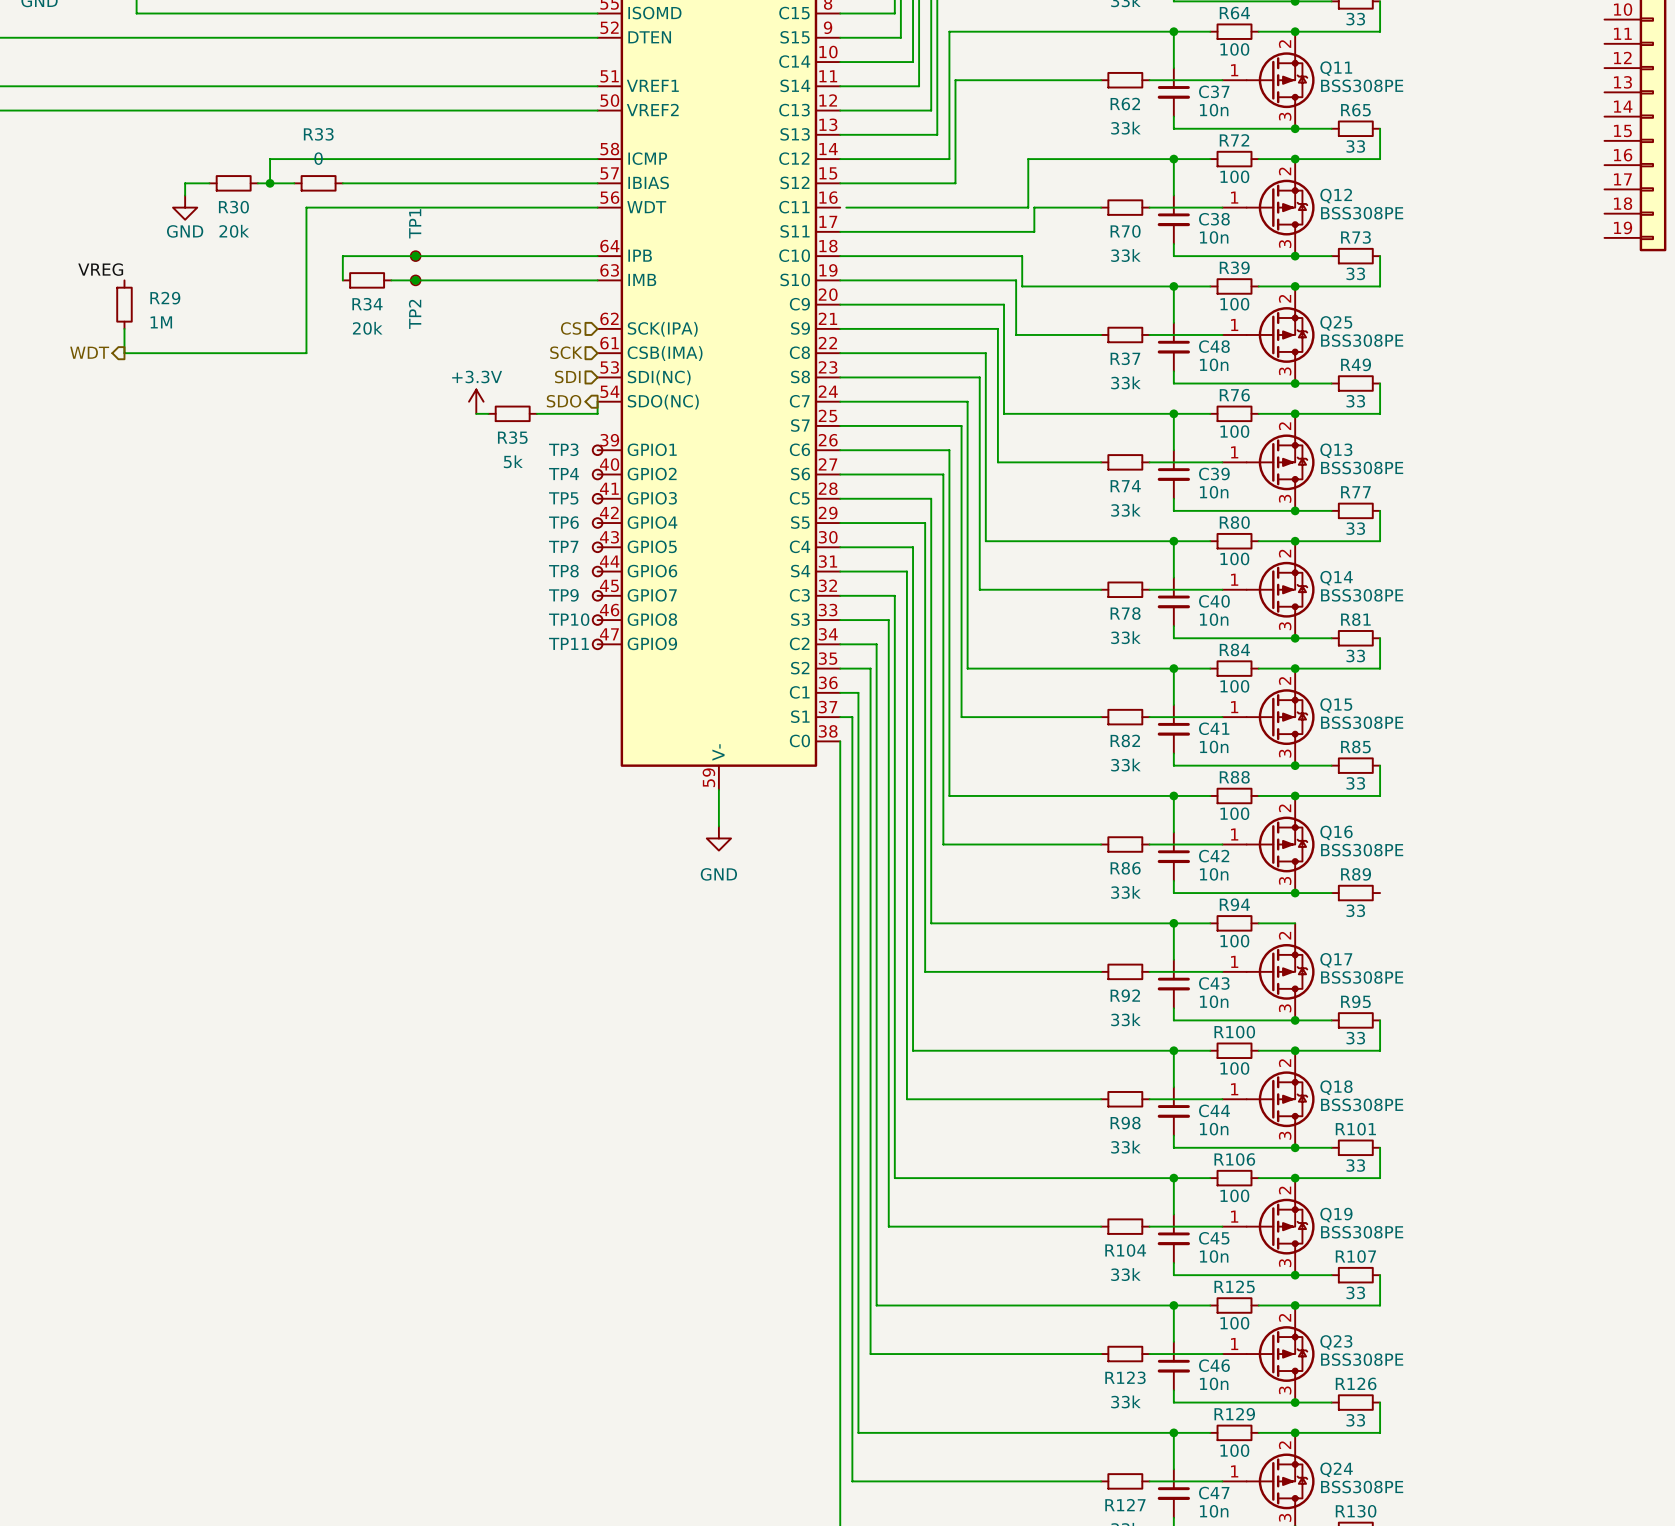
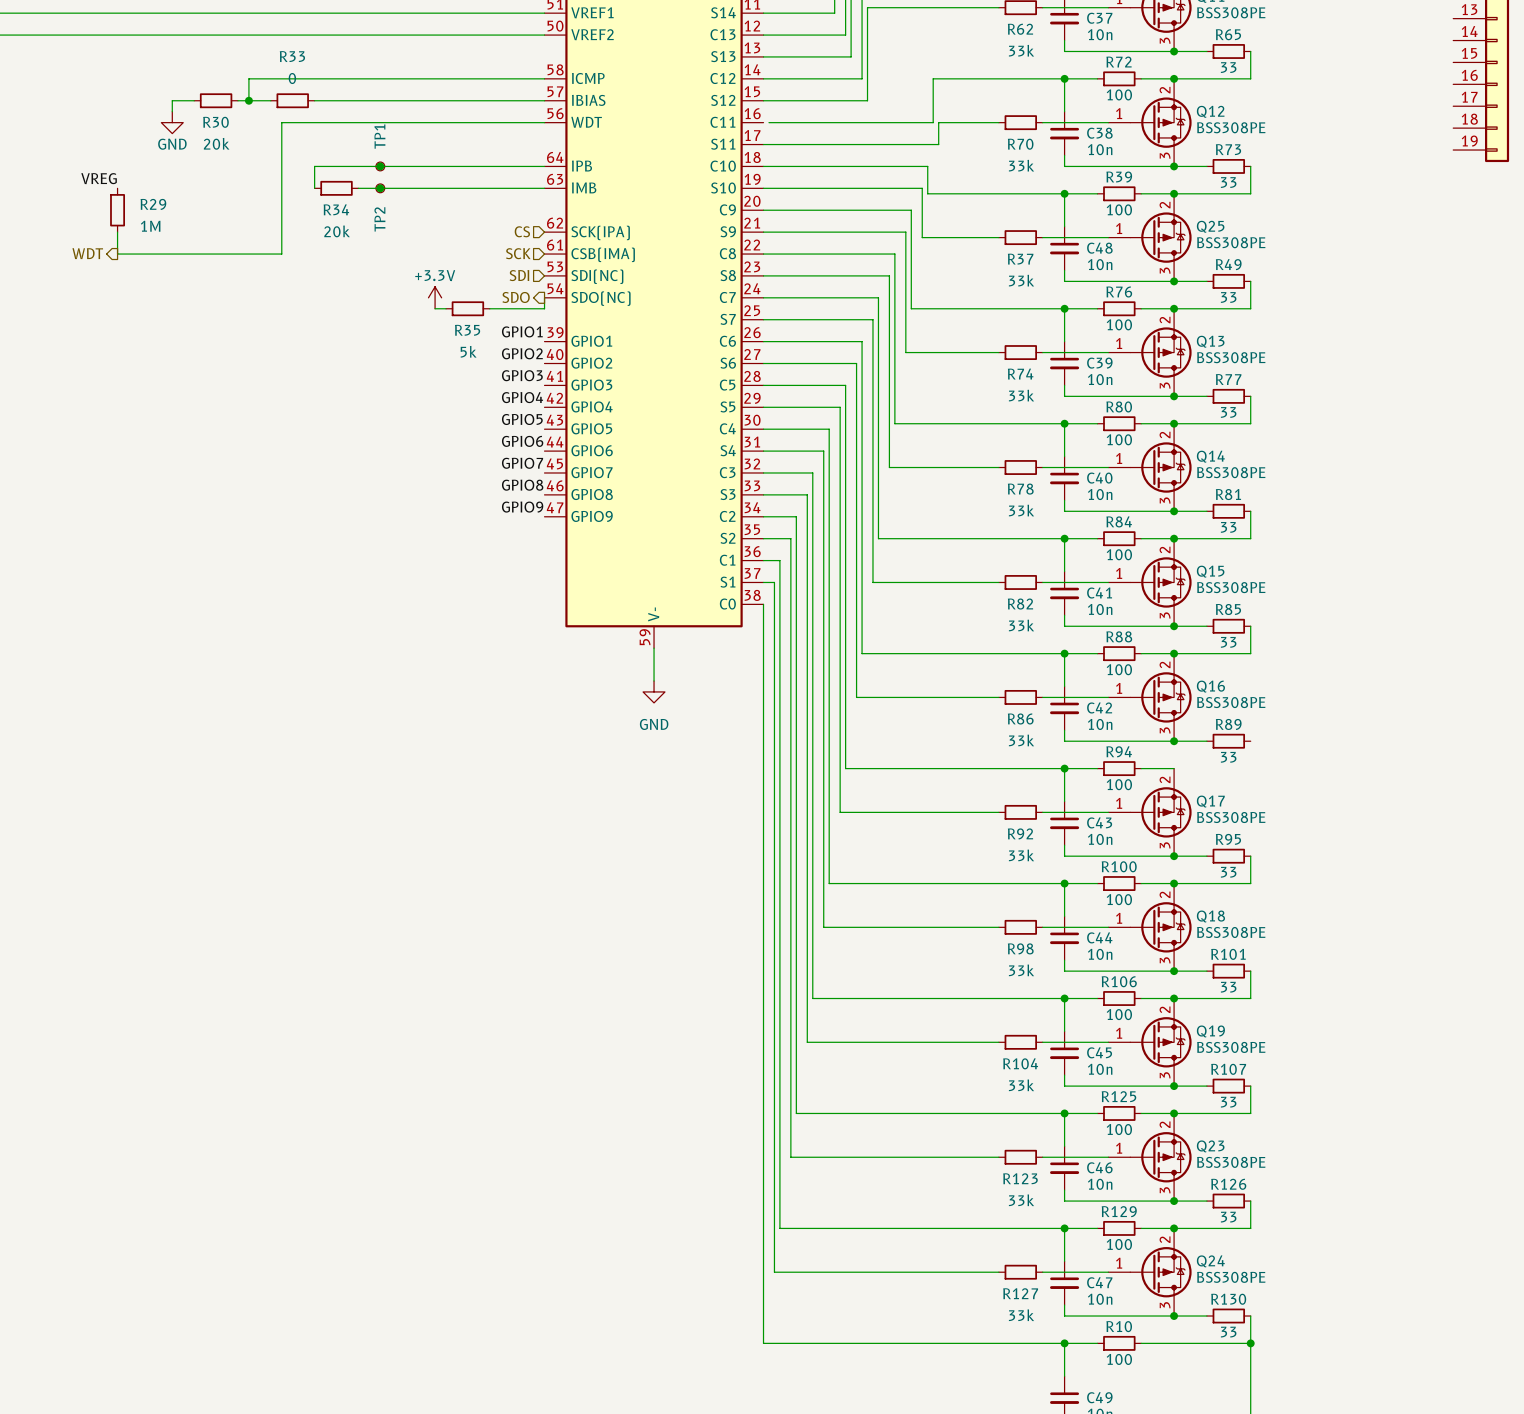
label: none -> GPIO1 (522, 331)
TP3: (597, 450) -> none
label: none -> GPIO2 (522, 353)
TP4: (597, 474) -> none
label: none -> GPIO3 (522, 375)
TP5: (597, 498) -> none
label: none -> GPIO4 (522, 397)
TP6: (597, 523) -> none
label: none -> GPIO5 (522, 419)
TP7: (597, 547) -> none
label: none -> GPIO6 (522, 441)
TP8: (597, 571) -> none
label: none -> GPIO7 (522, 463)
TP9: (597, 595) -> none
label: none -> GPIO8 (522, 485)
TP10: (597, 620) -> none
label: none -> GPIO9 (522, 507)
TP11: (597, 644) -> none

